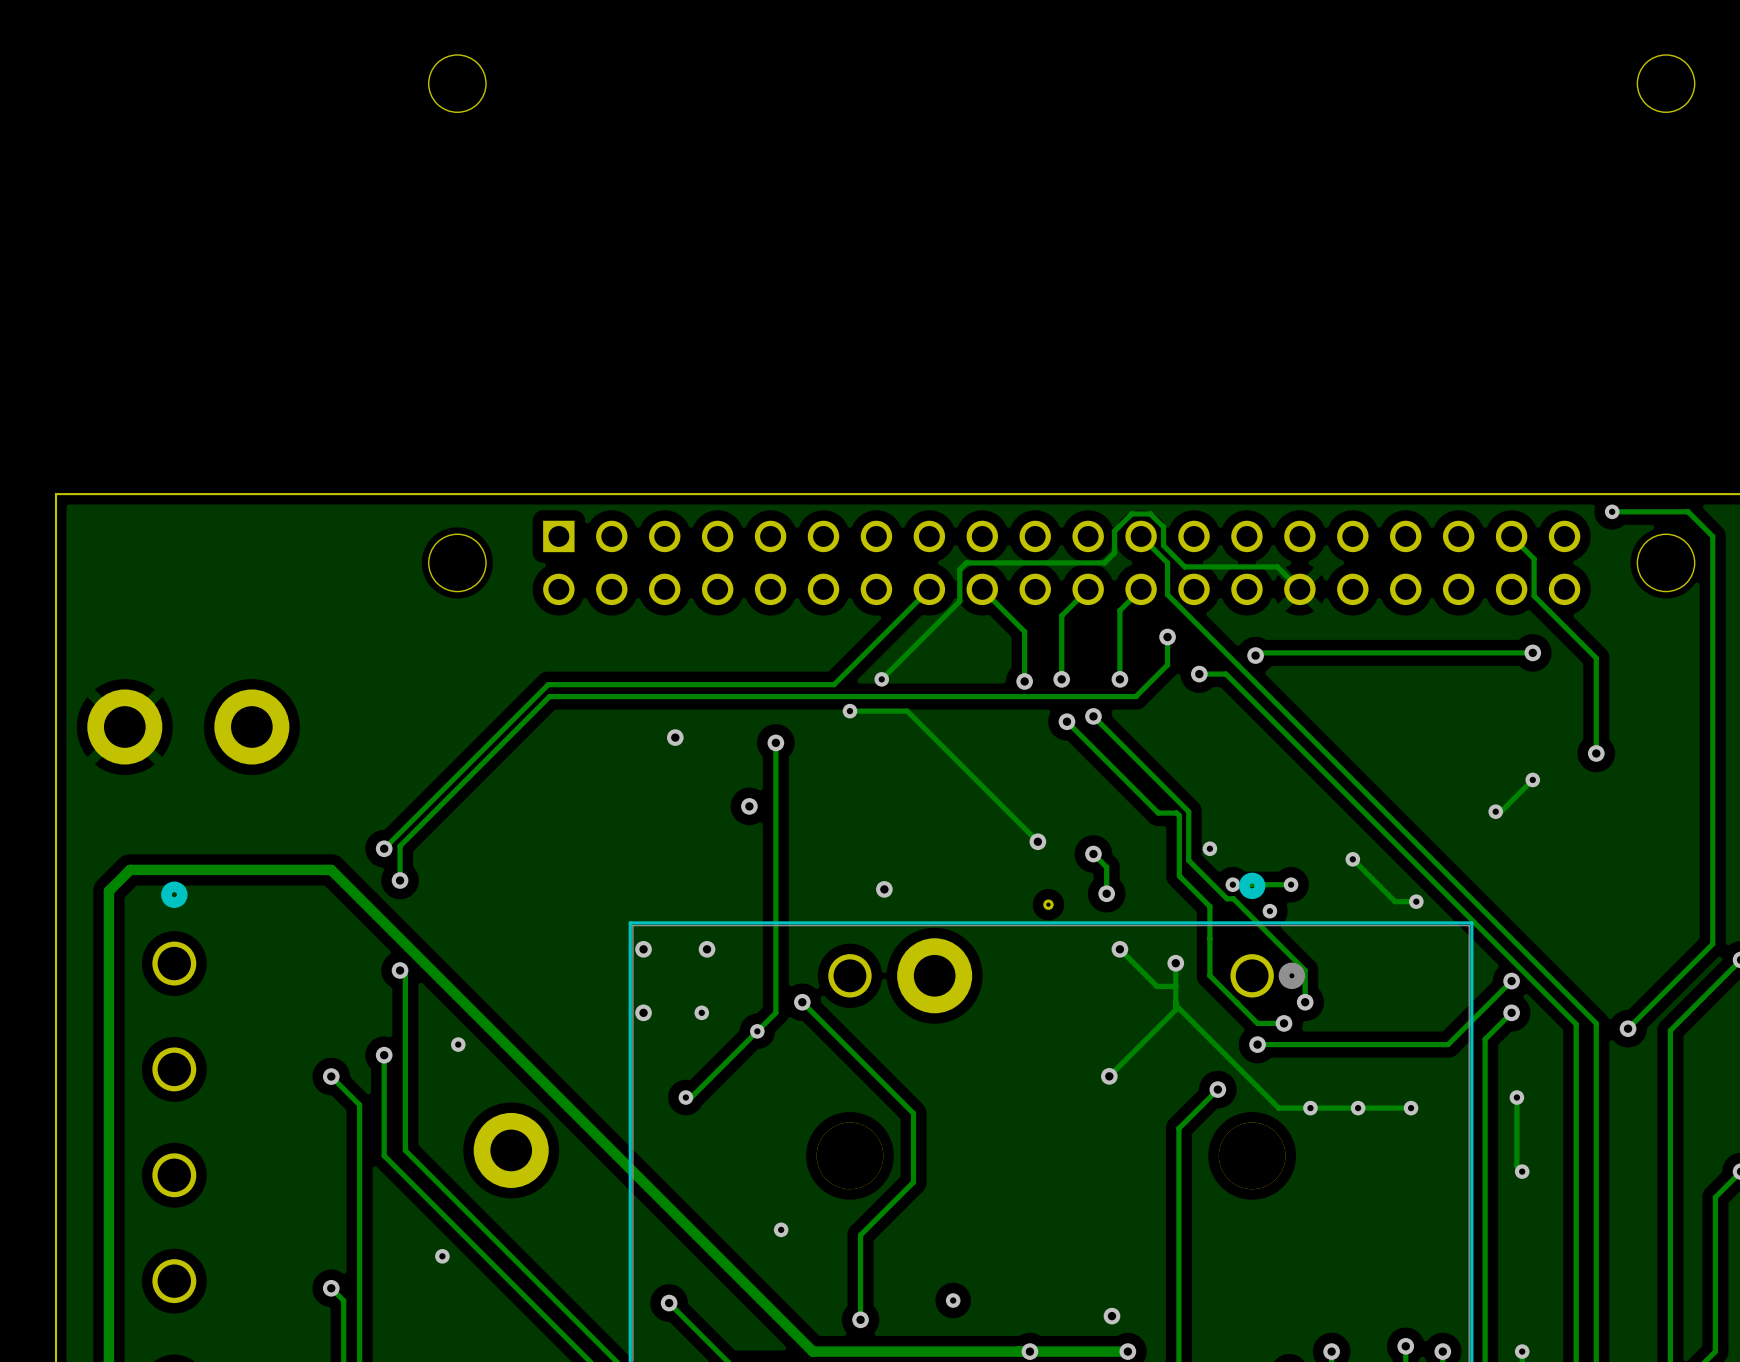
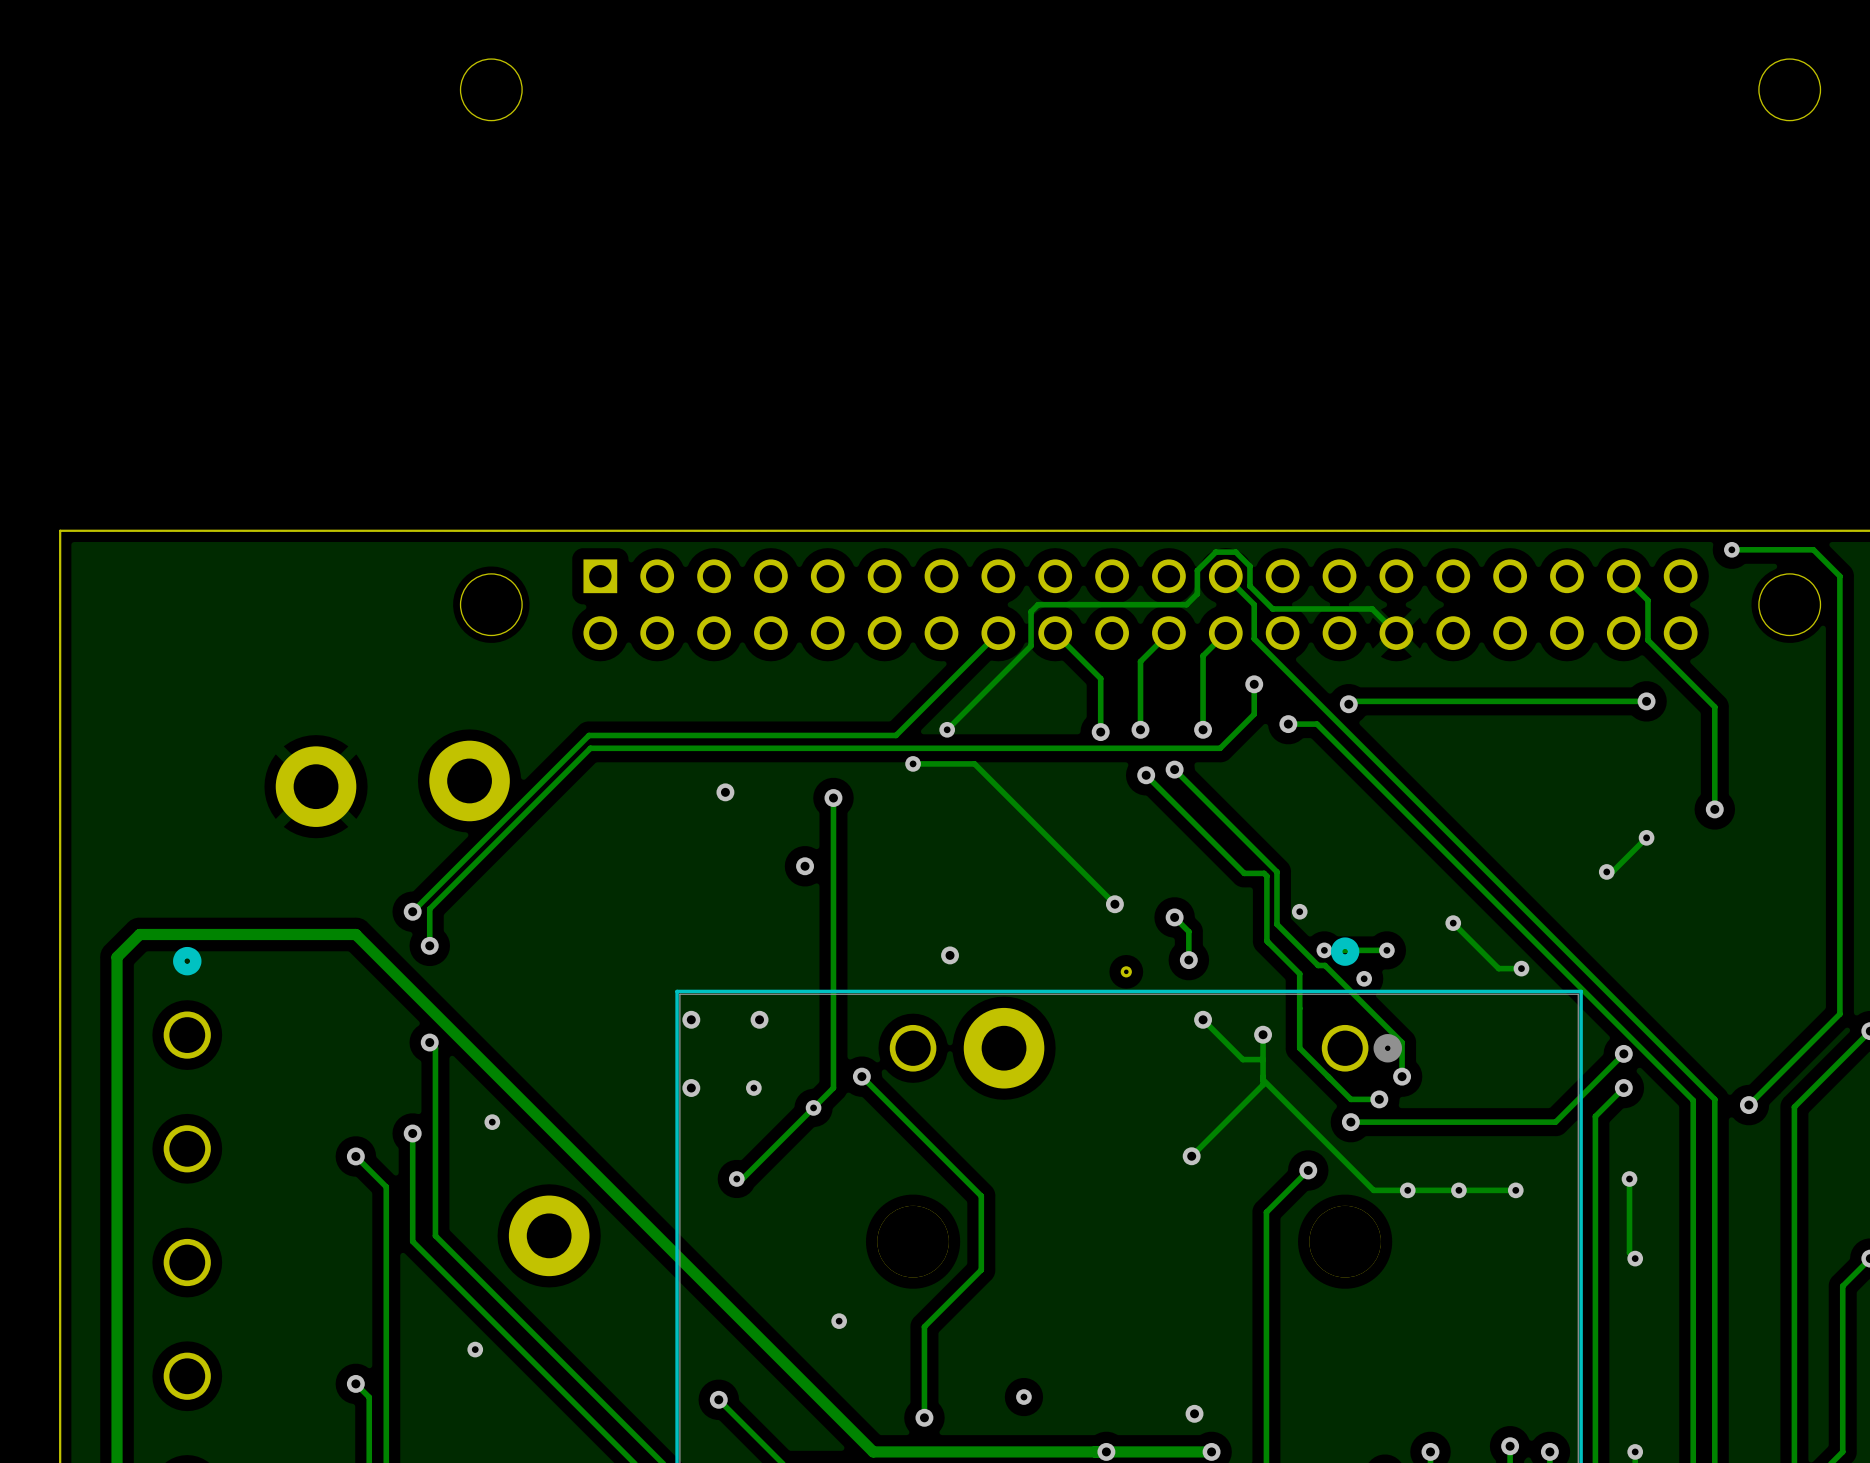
part: (124, 727) -> none
part position: (251, 727) -> (316, 786)
part: none -> (469, 780)

